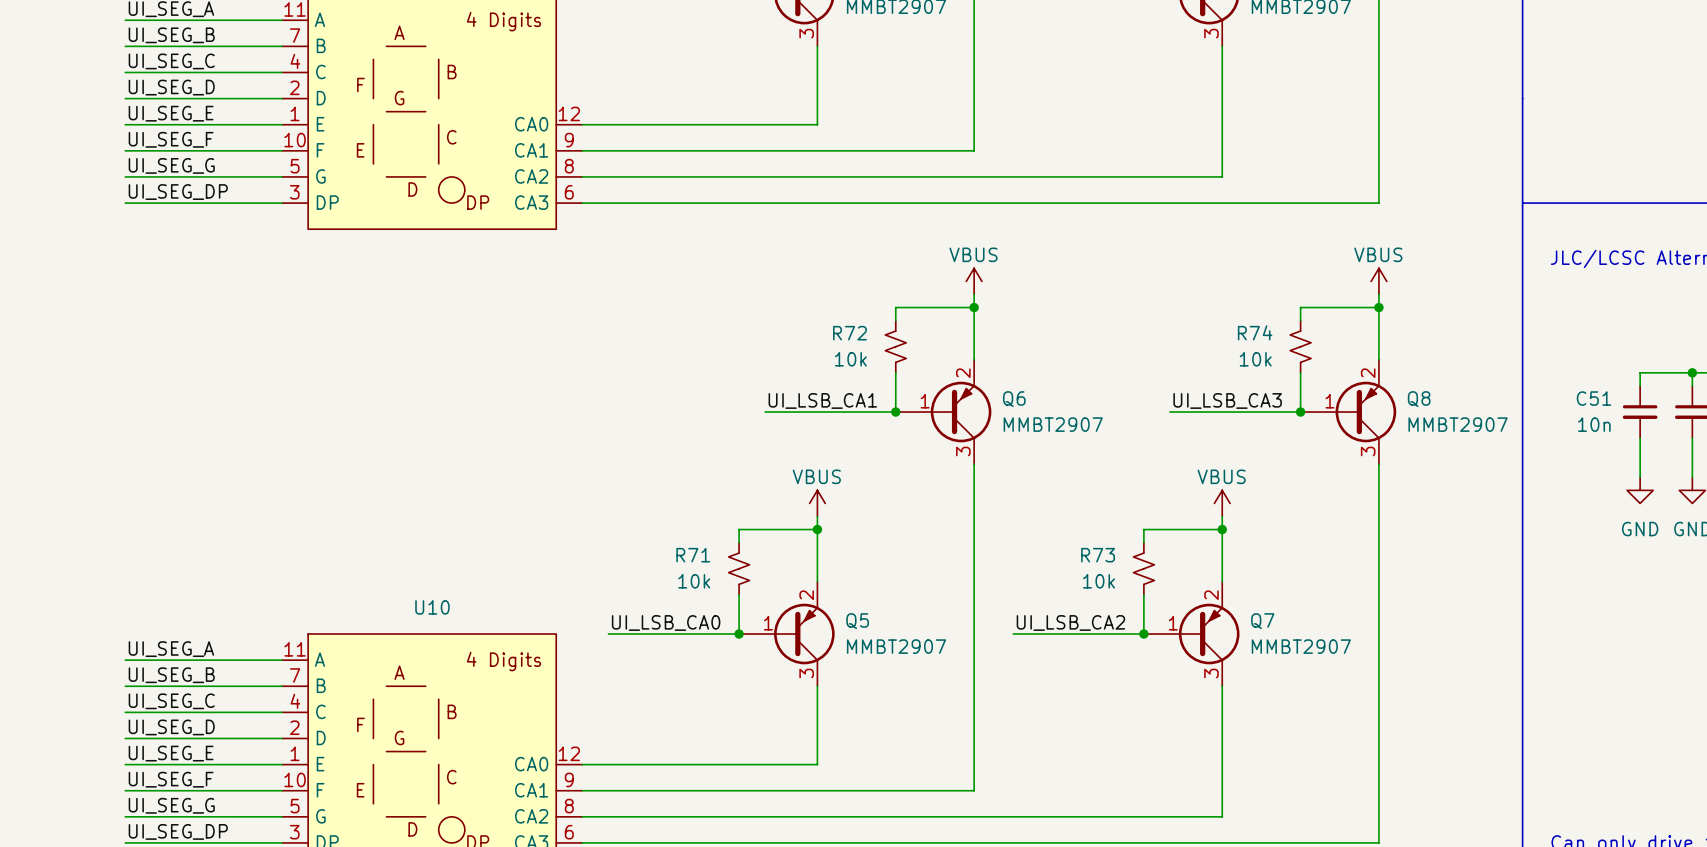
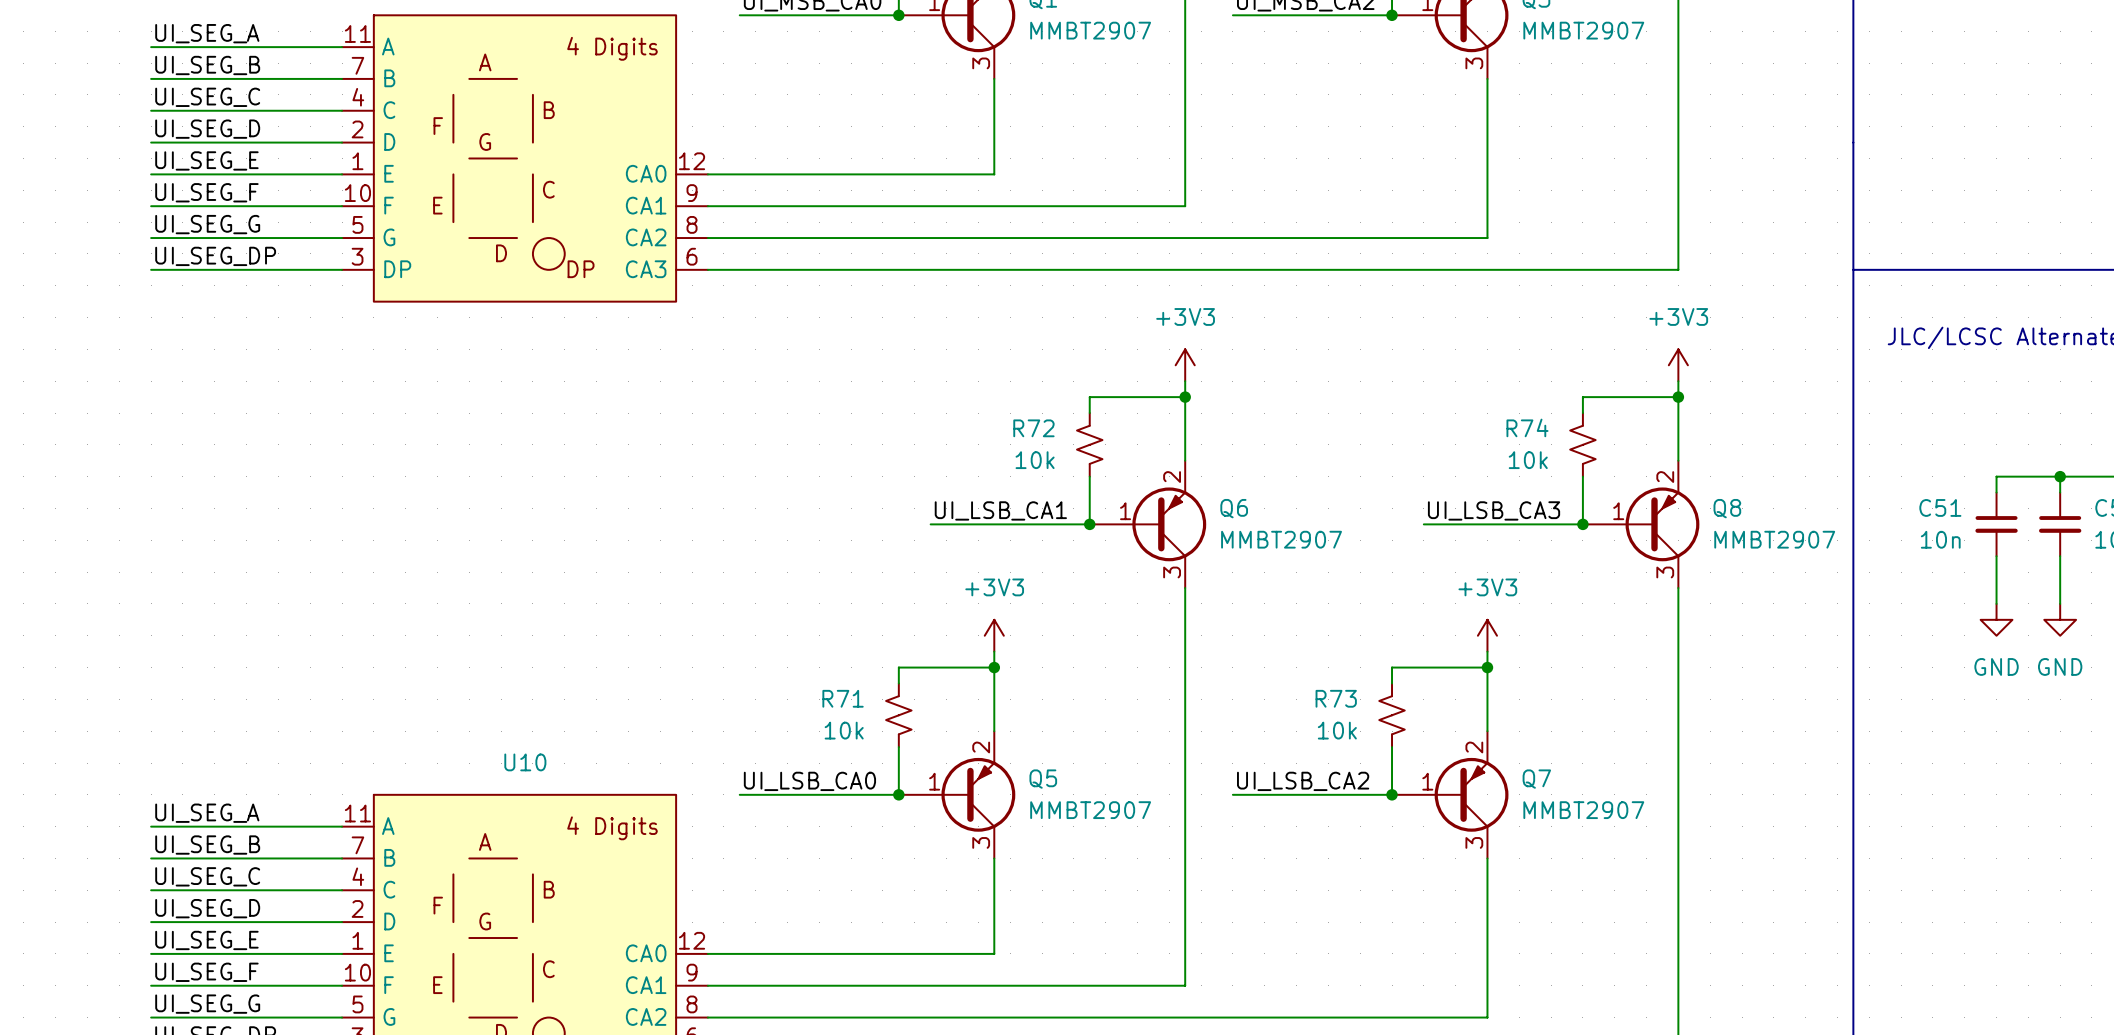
power symbol: VBUS (974, 281) -> +3V3 (1185, 365)
power symbol: VBUS (1378, 281) -> +3V3 (1678, 365)
power symbol: VBUS (817, 503) -> +3V3 (994, 635)
power symbol: VBUS (1222, 503) -> +3V3 (1487, 635)

